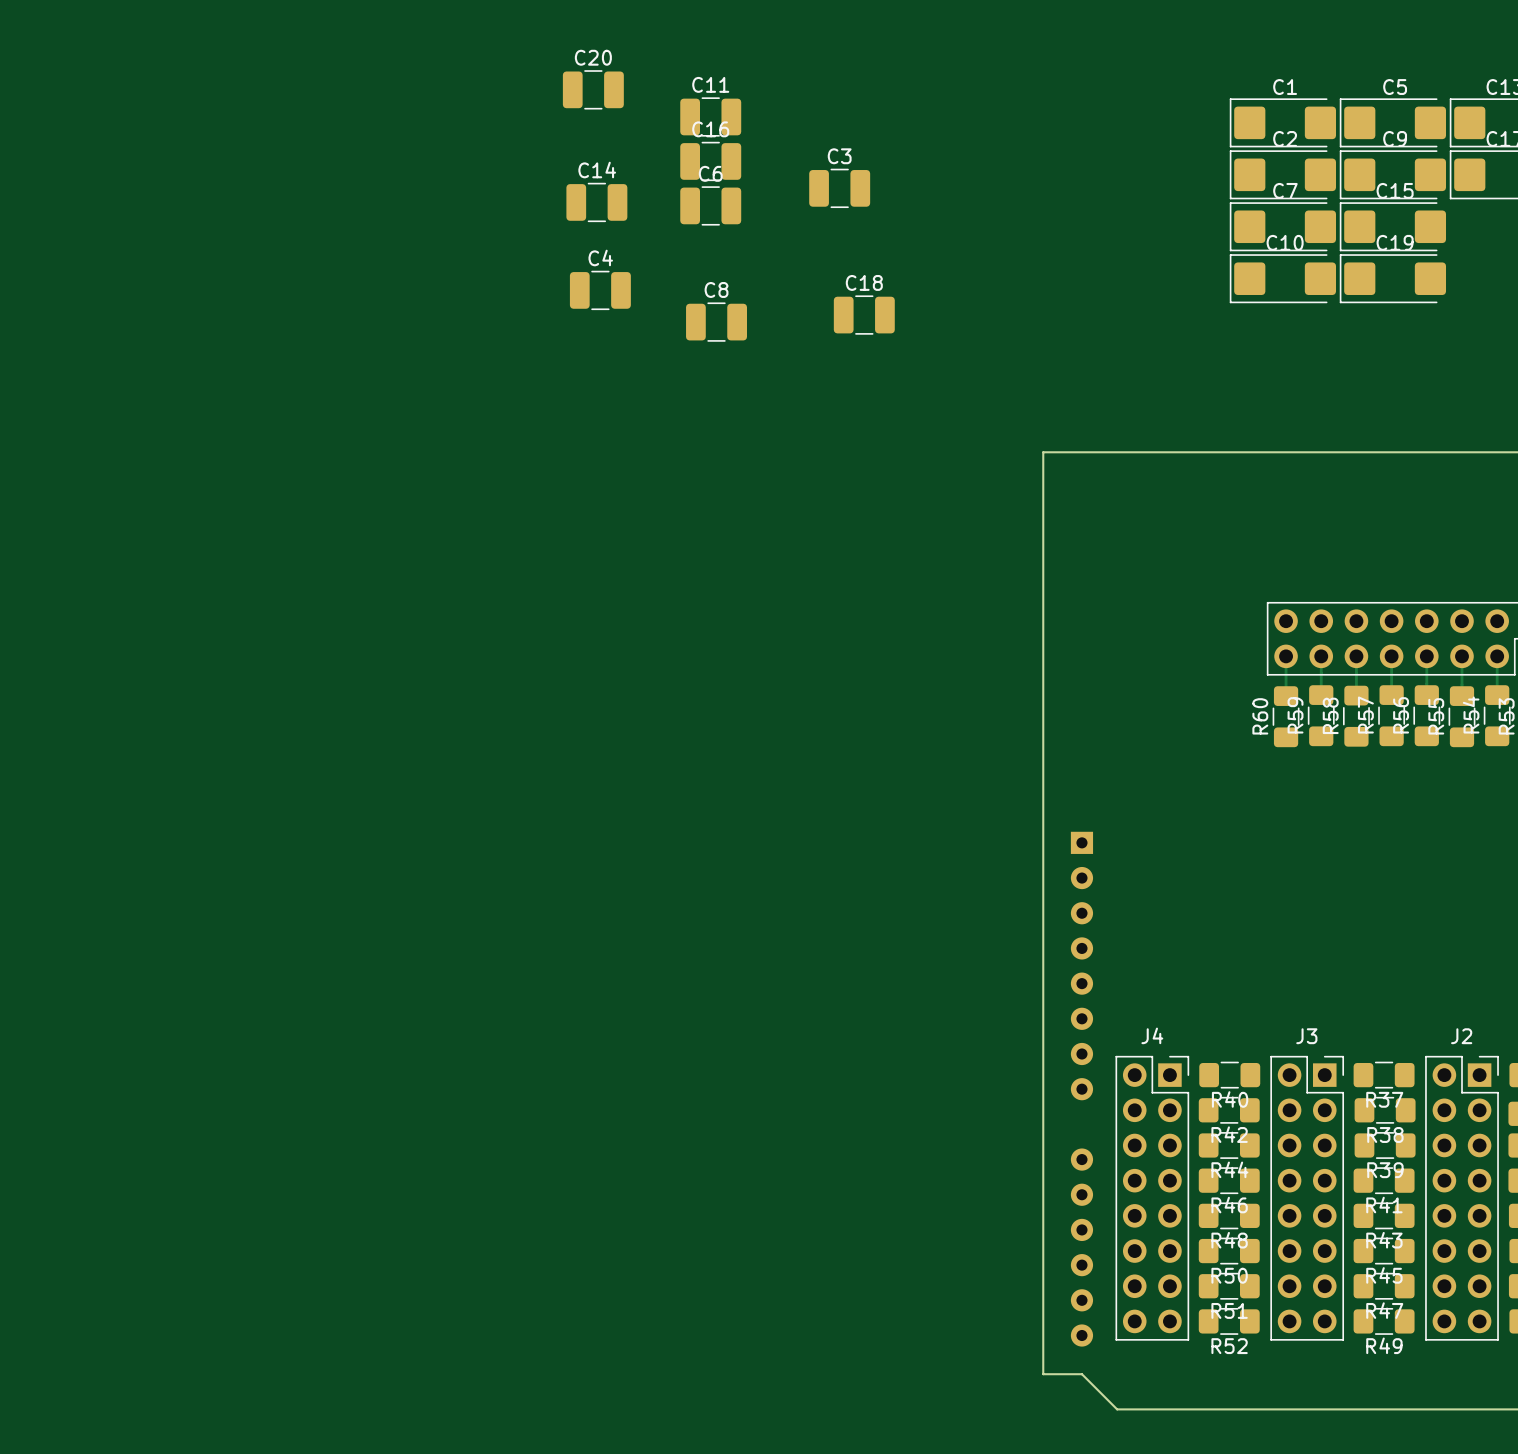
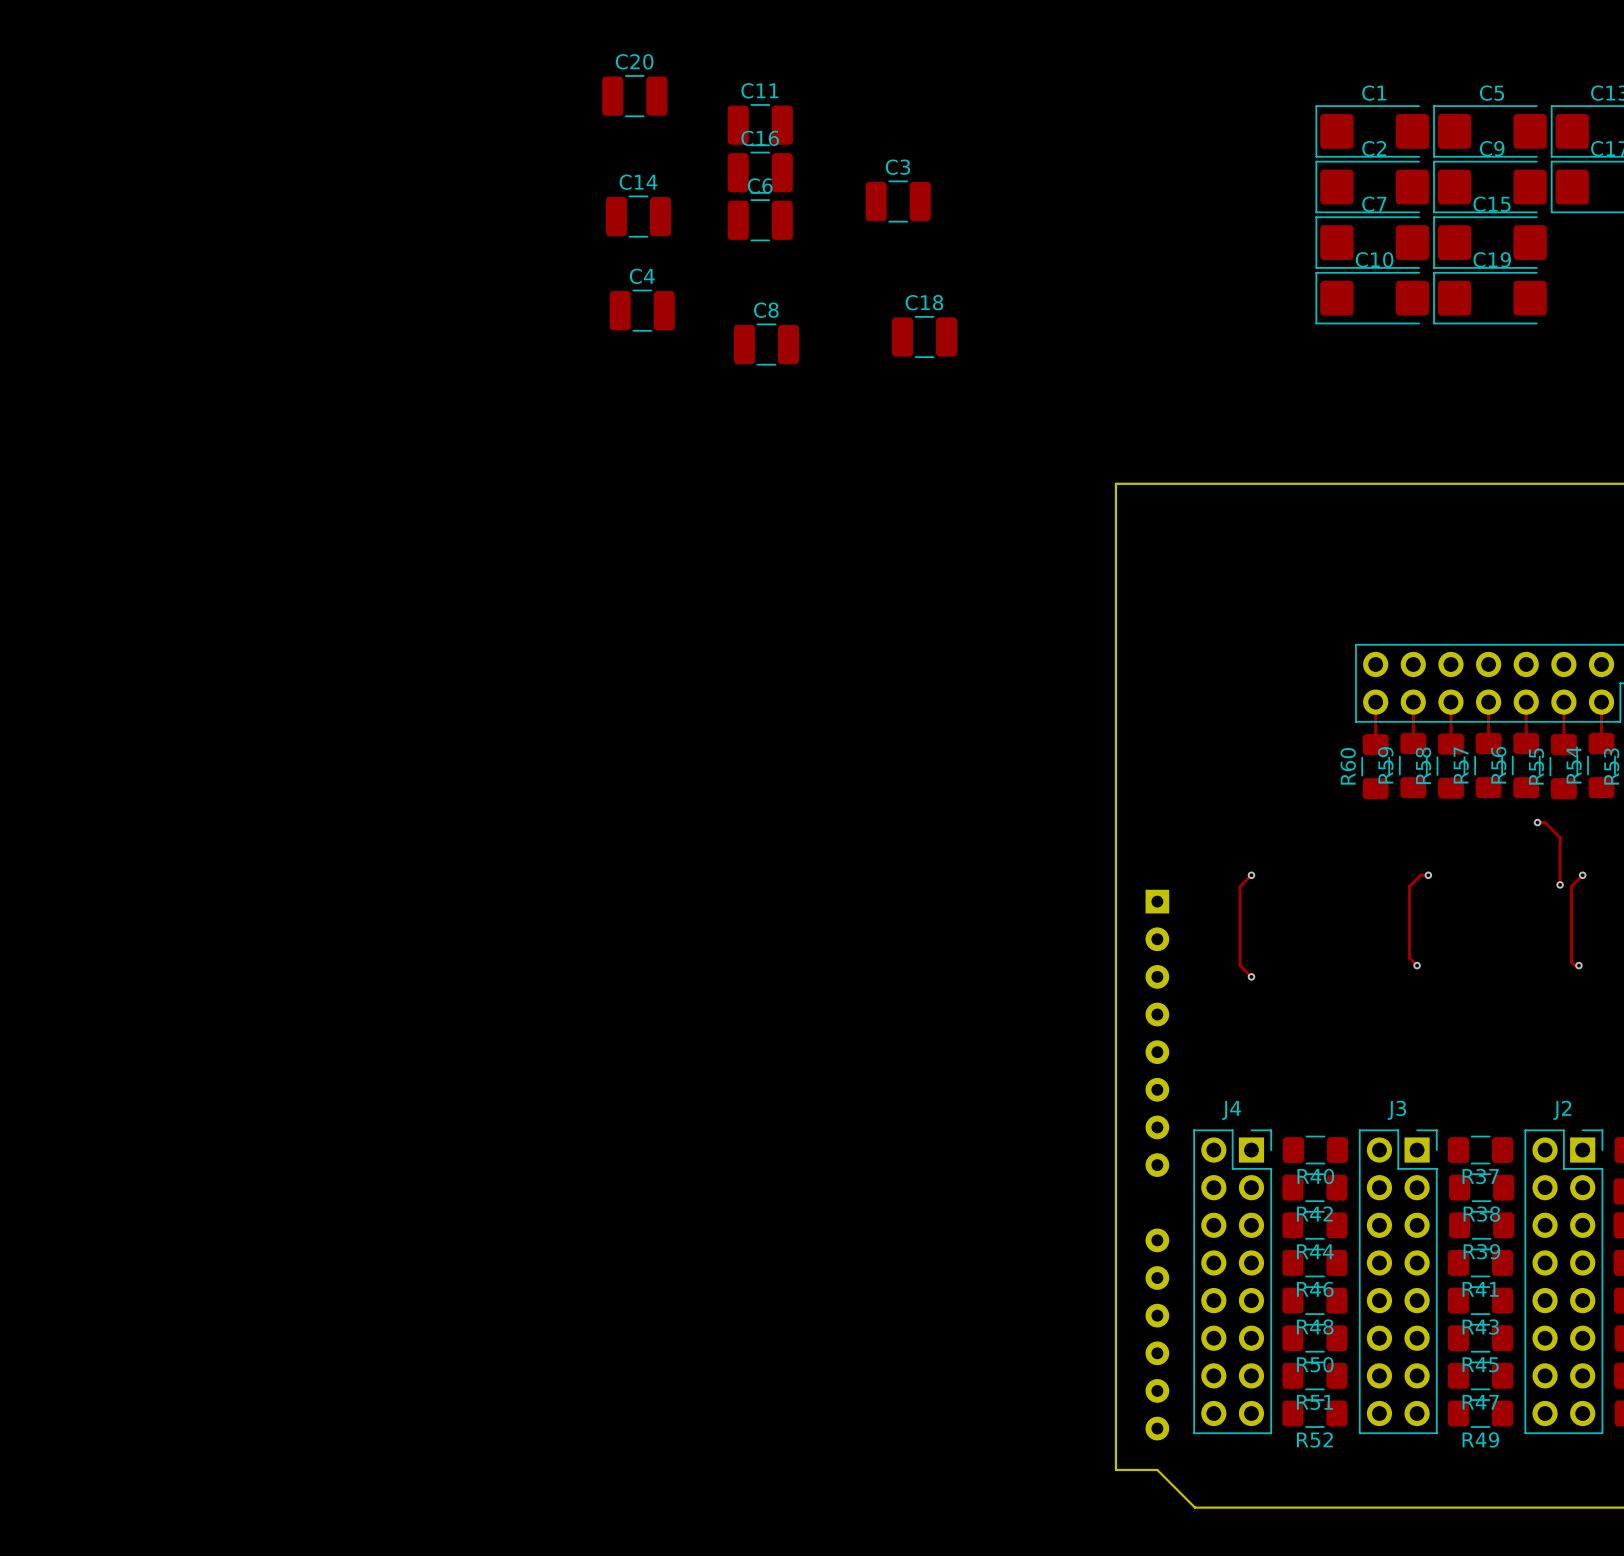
track: none -> (1537, 822) (1545, 822) (1560, 837) (1560, 884)
via: none -> (1537, 822)
track: none -> (1251, 875) (1240, 886) (1240, 965) (1251, 976)
via: none -> (1251, 875)
track: none -> (1428, 875) (1420, 875) (1409, 886) (1409, 958) (1417, 965)
via: none -> (1428, 875)
track: none -> (1582, 875) (1571, 886) (1571, 961) (1575, 965) (1578, 965)
via: none -> (1582, 875)
via: none -> (1560, 884)
via: none -> (1417, 965)
via: none -> (1578, 965)
via: none -> (1251, 976)

